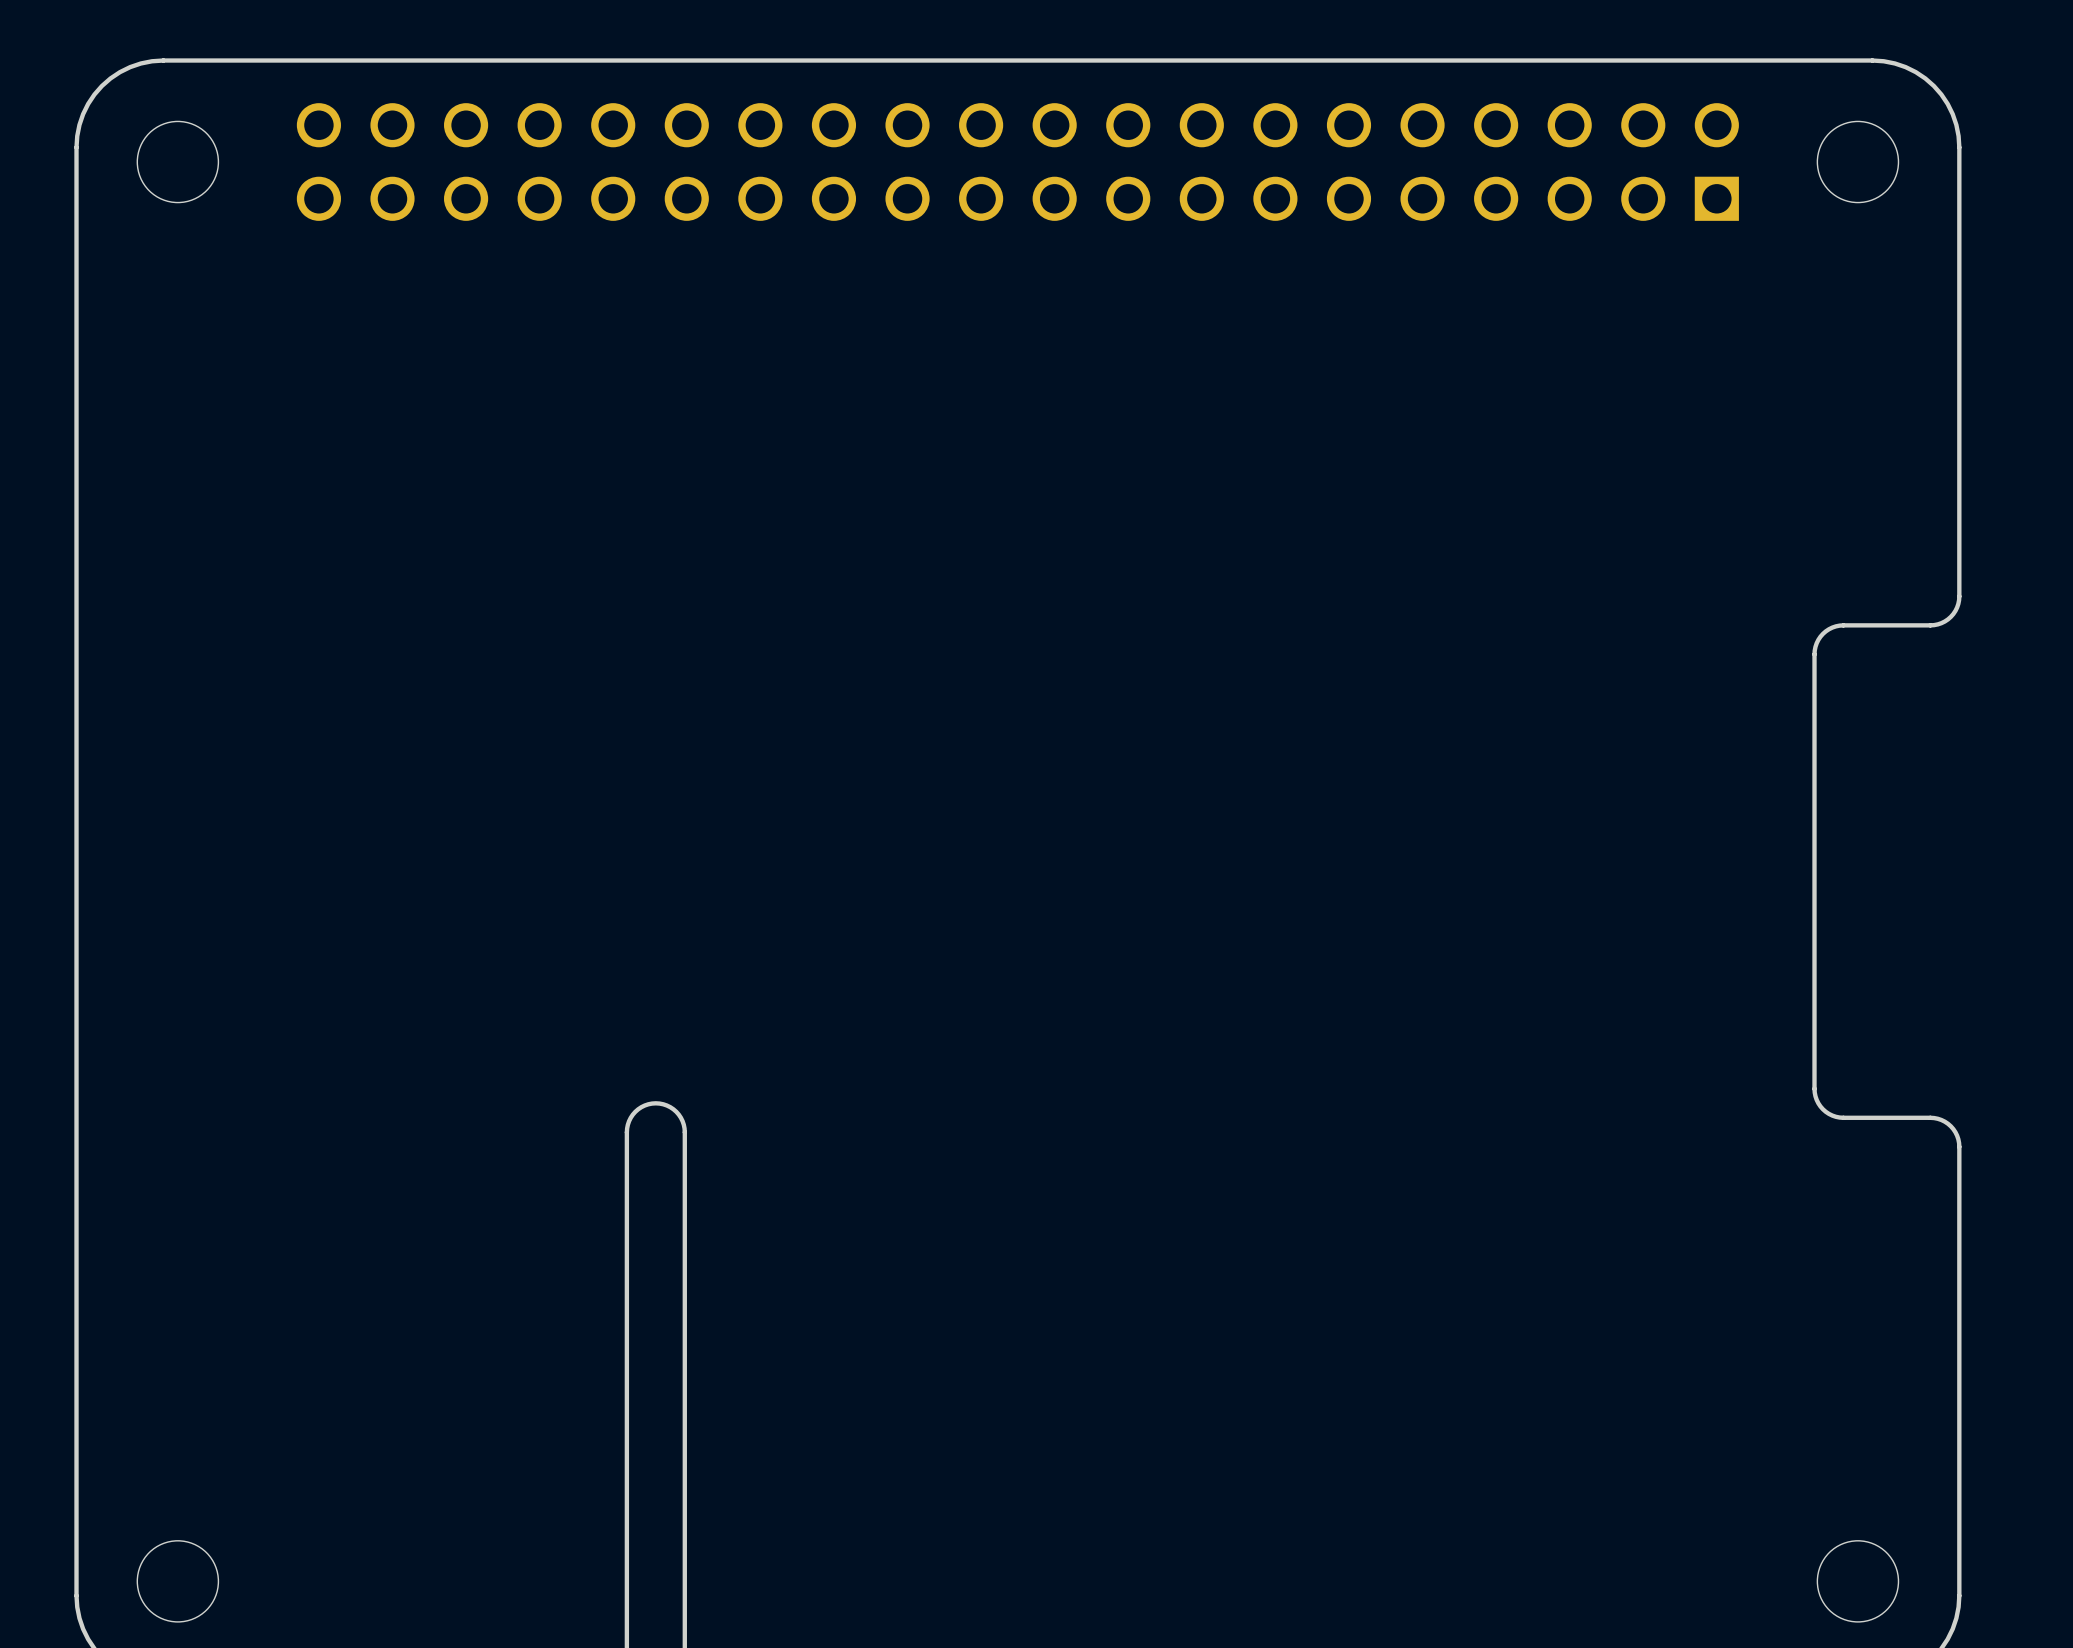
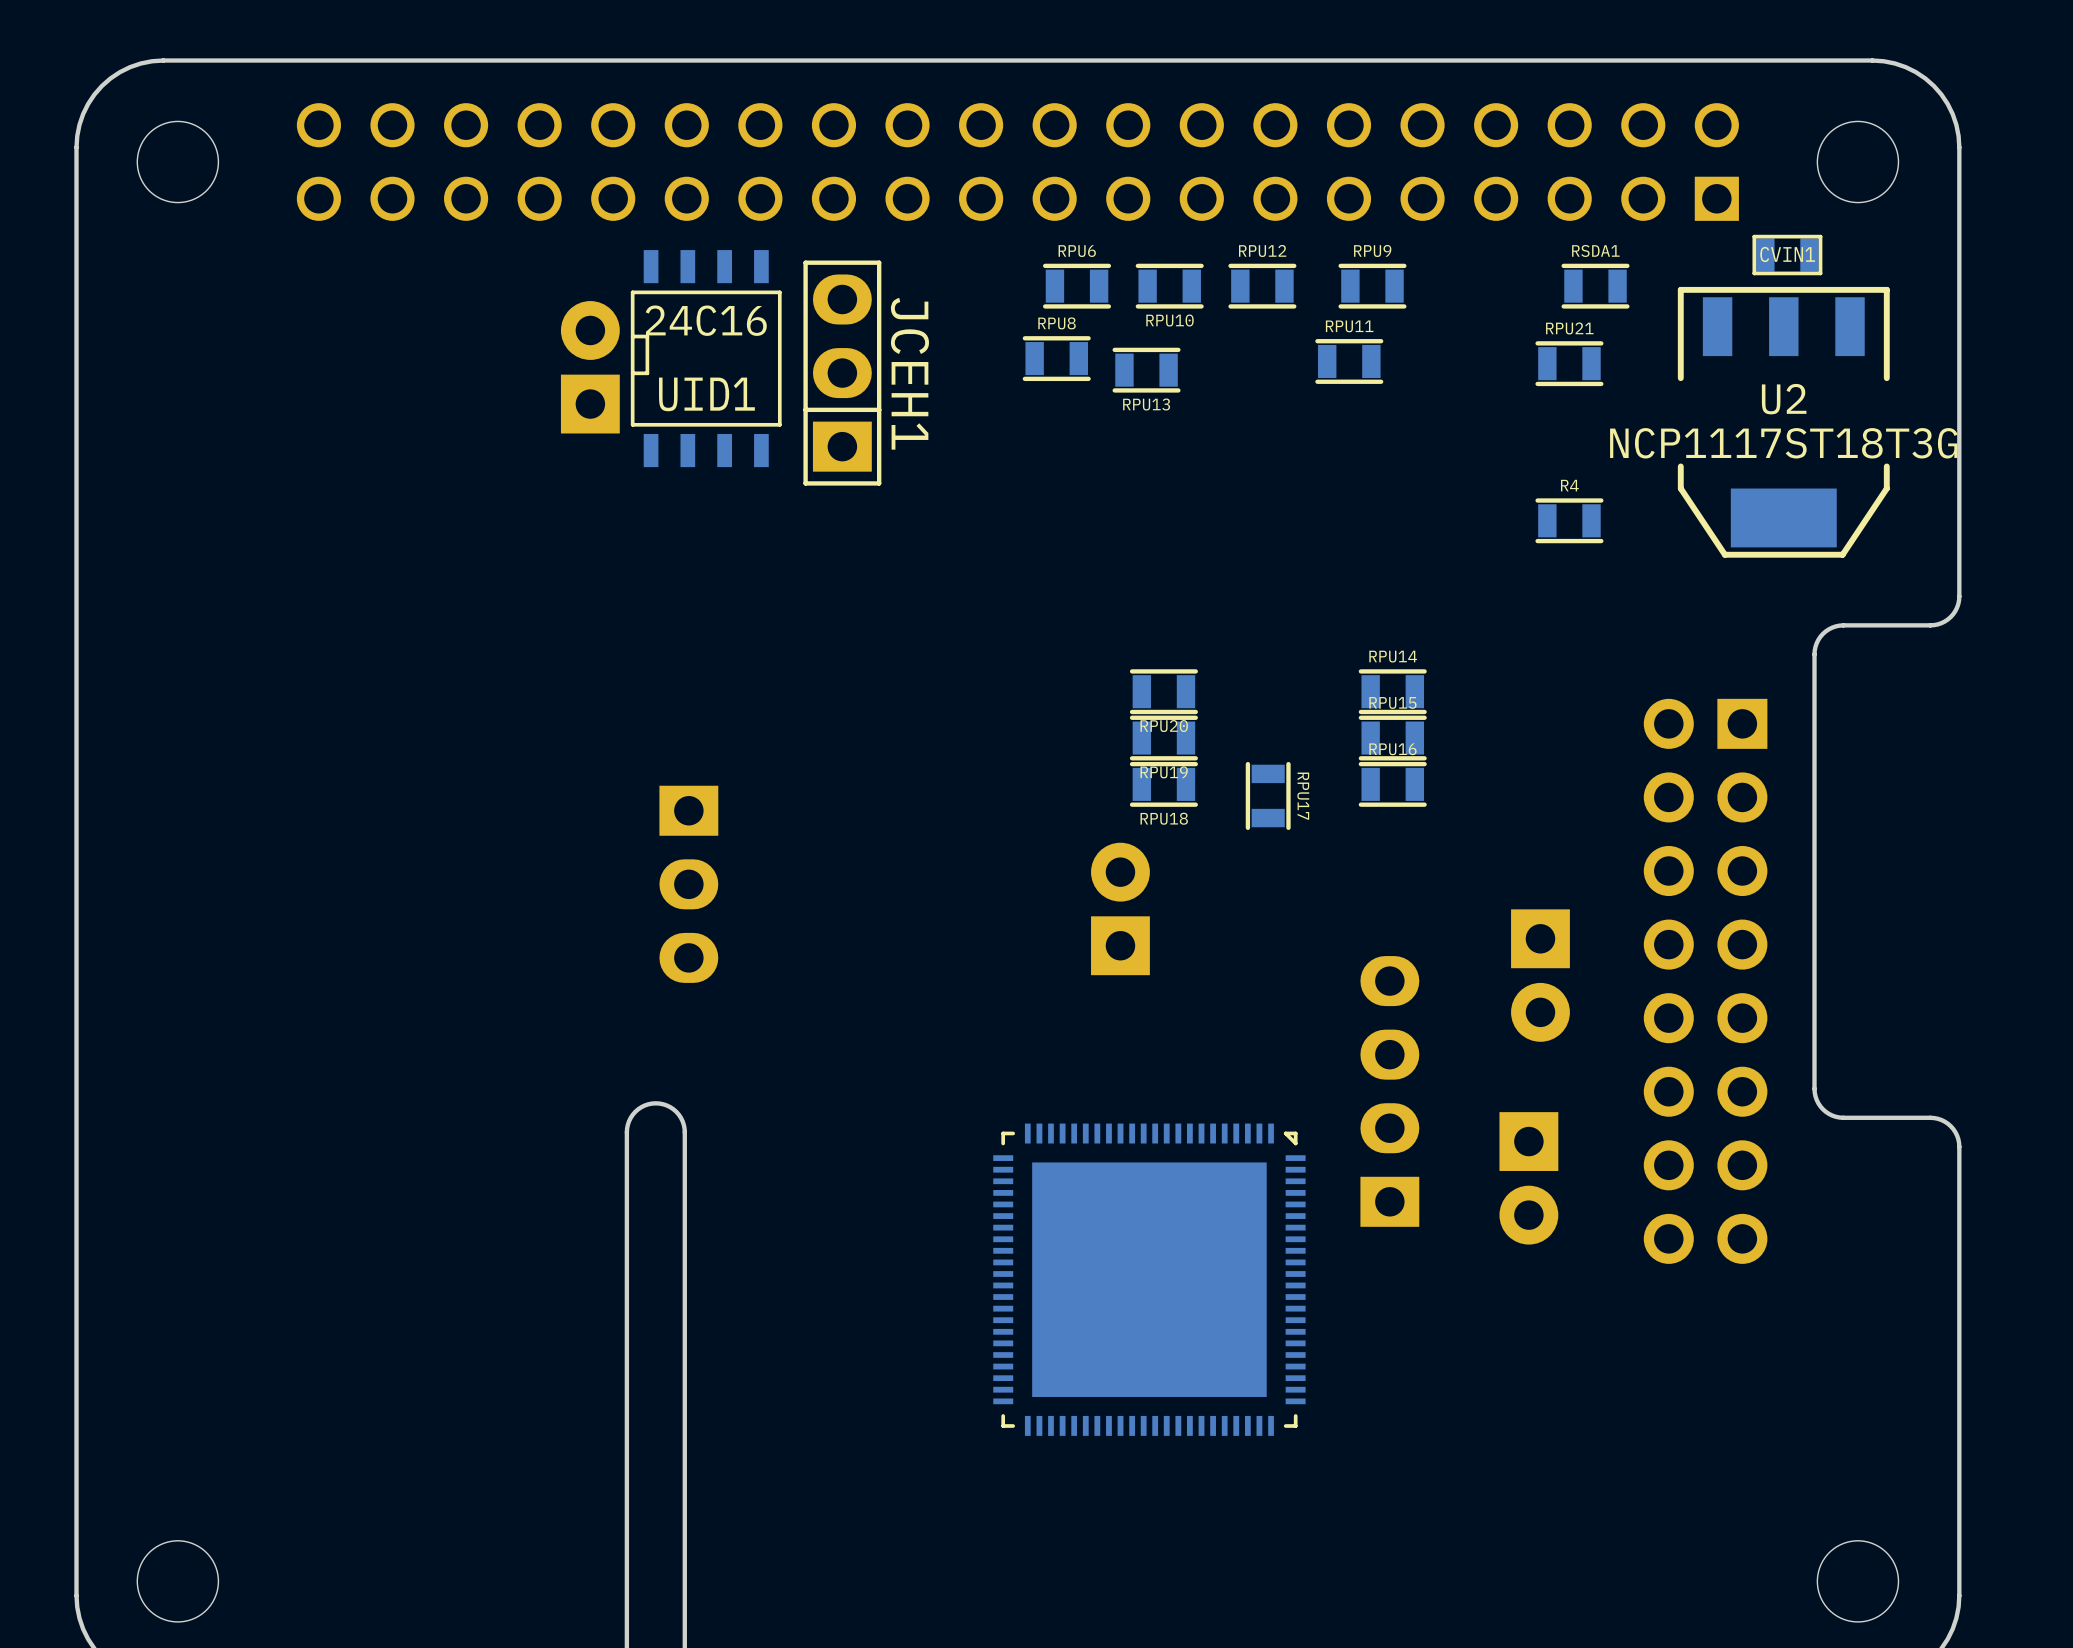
CVIN1: none -> (1787, 255)
RPU6: none -> (1077, 286)
RPU10: none -> (1169, 286)
RPU12: none -> (1262, 286)
RPU9: none -> (1372, 286)
RSDA1: none -> (1595, 286)
UID1: none -> 24C16 (706, 358)
RPU8: none -> (1056, 358)
RPU11: none -> (1349, 361)
RPU21: none -> (1569, 363)
part: none -> (590, 367)
RPU13: none -> (1146, 370)
JCEH1: none -> (842, 373)
U2: none -> NCP1117ST18T3G (1783, 422)
R4: none -> (1569, 520)
RPU20: none -> (1163, 691)
RPU14: none -> (1392, 691)
RPU19: none -> (1163, 738)
RPU15: none -> (1392, 738)
RPU18: none -> (1163, 784)
RPU16: none -> (1392, 784)
RPU17: none -> (1268, 795)
part: none -> (688, 884)
part: none -> (1120, 908)
part: none -> (1540, 975)
part: none -> (1705, 981)
part: none -> (1389, 1091)
part: none -> (1528, 1178)
part: none -> (1149, 1279)

